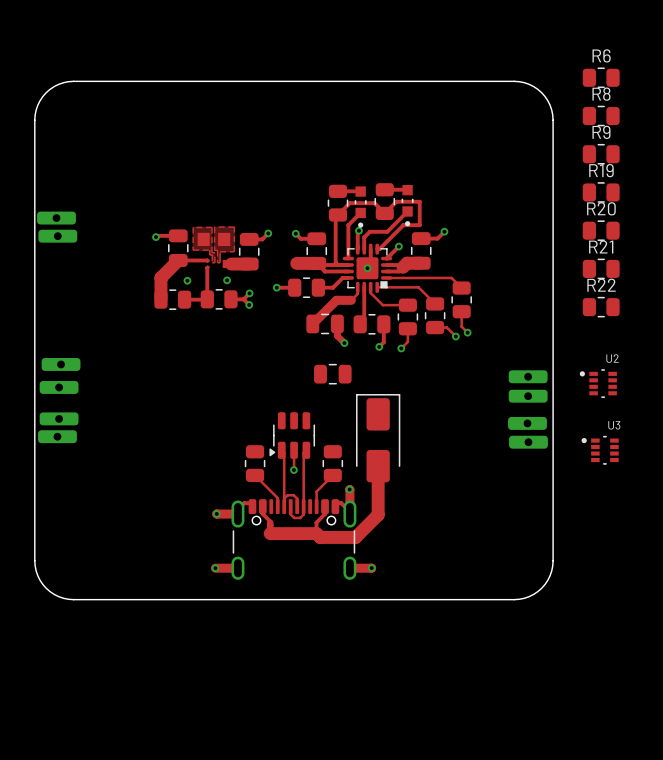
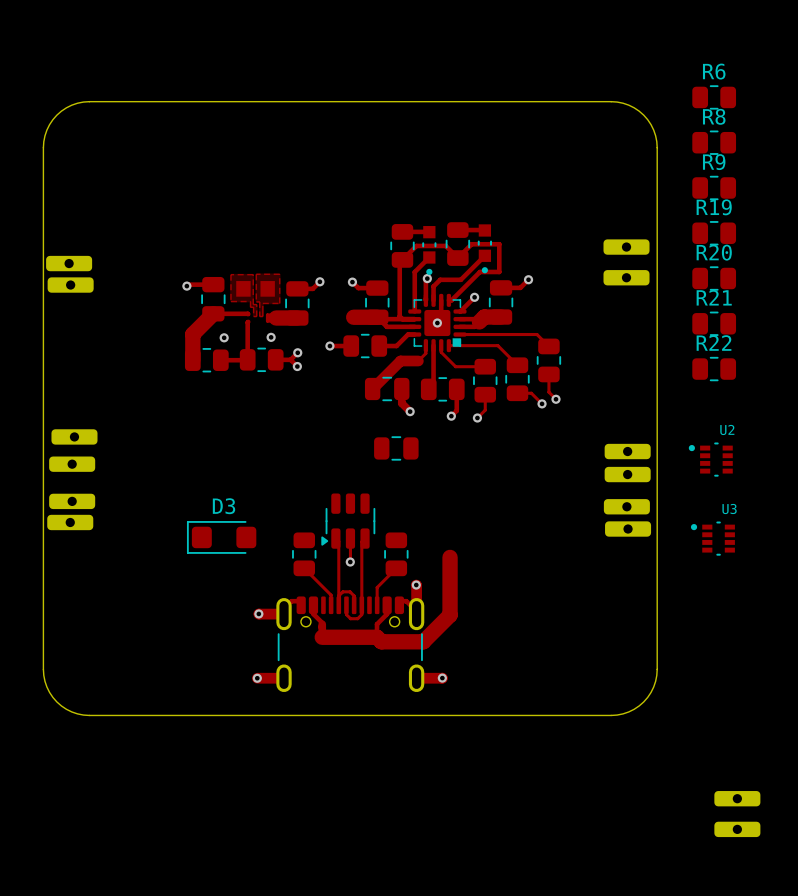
part: none -> (626, 247)
part: none -> (626, 277)
part: (378, 438) -> none
D3: none -> (221, 537)
part: none -> (737, 798)
part: none -> (737, 829)

